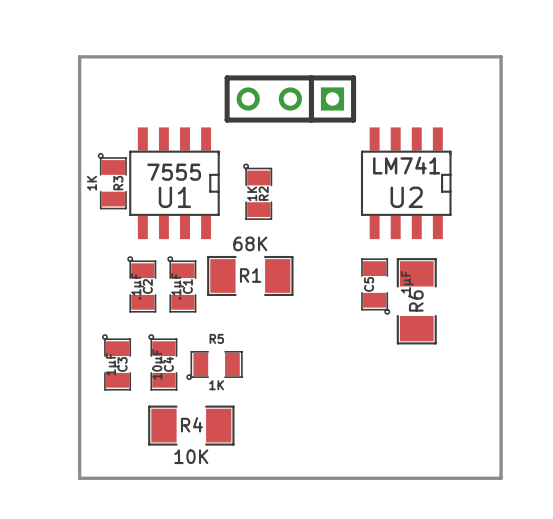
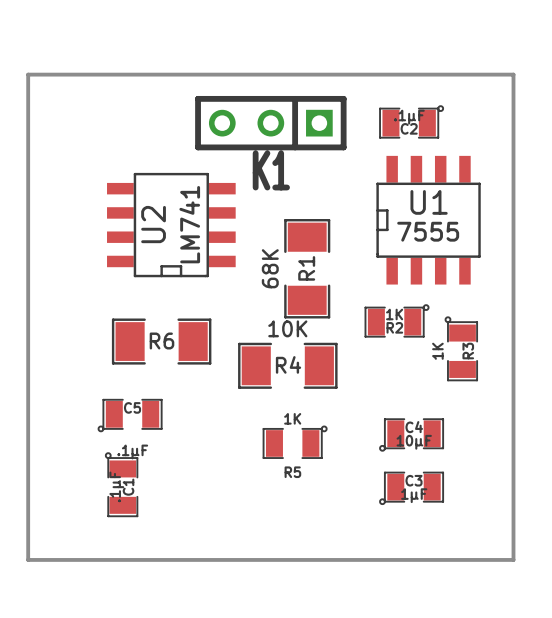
K1 name: none -> K1 (271, 170)
R3 position: (112, 181) -> (461, 348)
U1 rotation: 0° (174, 183) -> 180° (428, 220)
U1 position: (174, 183) -> (428, 220)
U2 rotation: 0° (406, 183) -> 90° clockwise (171, 225)
U2 position: (406, 183) -> (171, 225)
R2 rotation: 0° (257, 191) -> 90° clockwise (397, 320)
R2 position: (257, 191) -> (397, 320)
R1 value position: 68K (250, 243) -> 68K (270, 268)
R1 rotation: 0° (250, 275) -> 90° clockwise (307, 268)
R1 position: (250, 275) -> (307, 268)
C2 rotation: 0° (141, 284) -> 90° clockwise (411, 121)
C2 position: (141, 284) -> (411, 121)
C1 position: (181, 284) -> (121, 484)
C5 rotation: 0° (375, 286) -> 90° clockwise (130, 415)
C5 position: (375, 286) -> (130, 415)
R6 rotation: 0° (416, 301) -> 90° clockwise (161, 341)
R6 position: (416, 301) -> (161, 341)
C3 rotation: 0° (116, 362) -> 90° counterclockwise (411, 488)
C3 position: (116, 362) -> (411, 488)
C4 rotation: 0° (162, 362) -> 90° counterclockwise (411, 434)
C4 position: (162, 362) -> (411, 434)
R5 rotation: 0° (214, 365) -> 180° (295, 442)
R5 position: (214, 365) -> (295, 442)
R4 position: (191, 425) -> (287, 365)
R4 value position: 10K (191, 456) -> 10K (287, 328)

